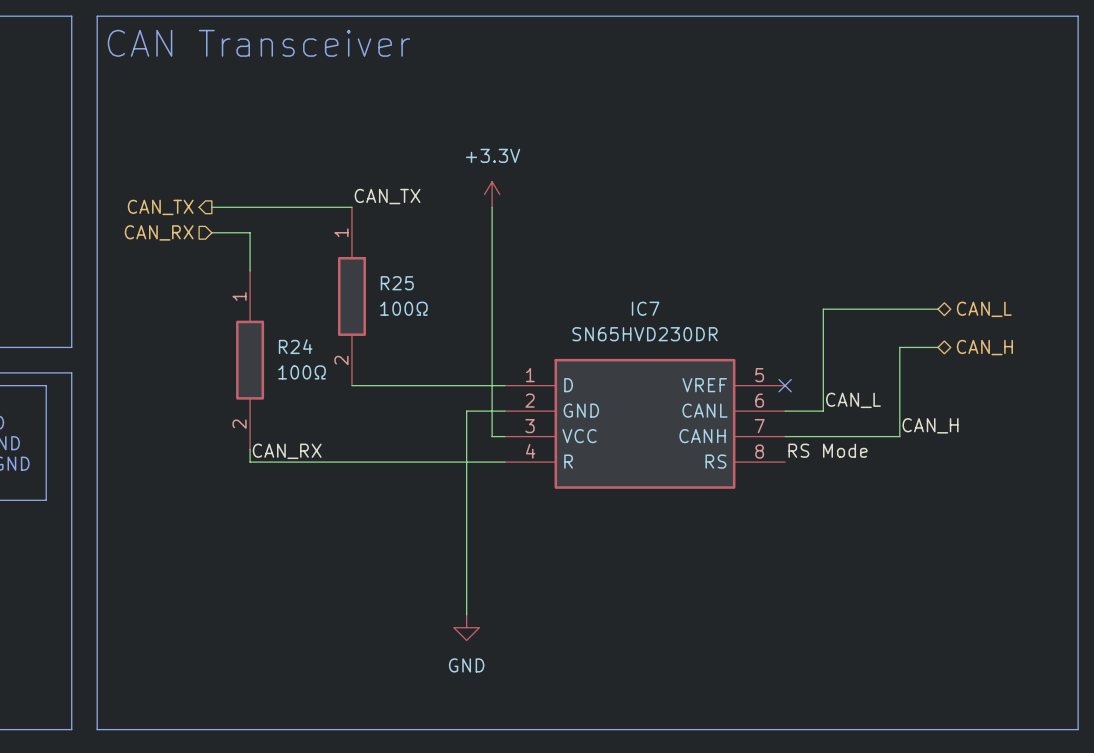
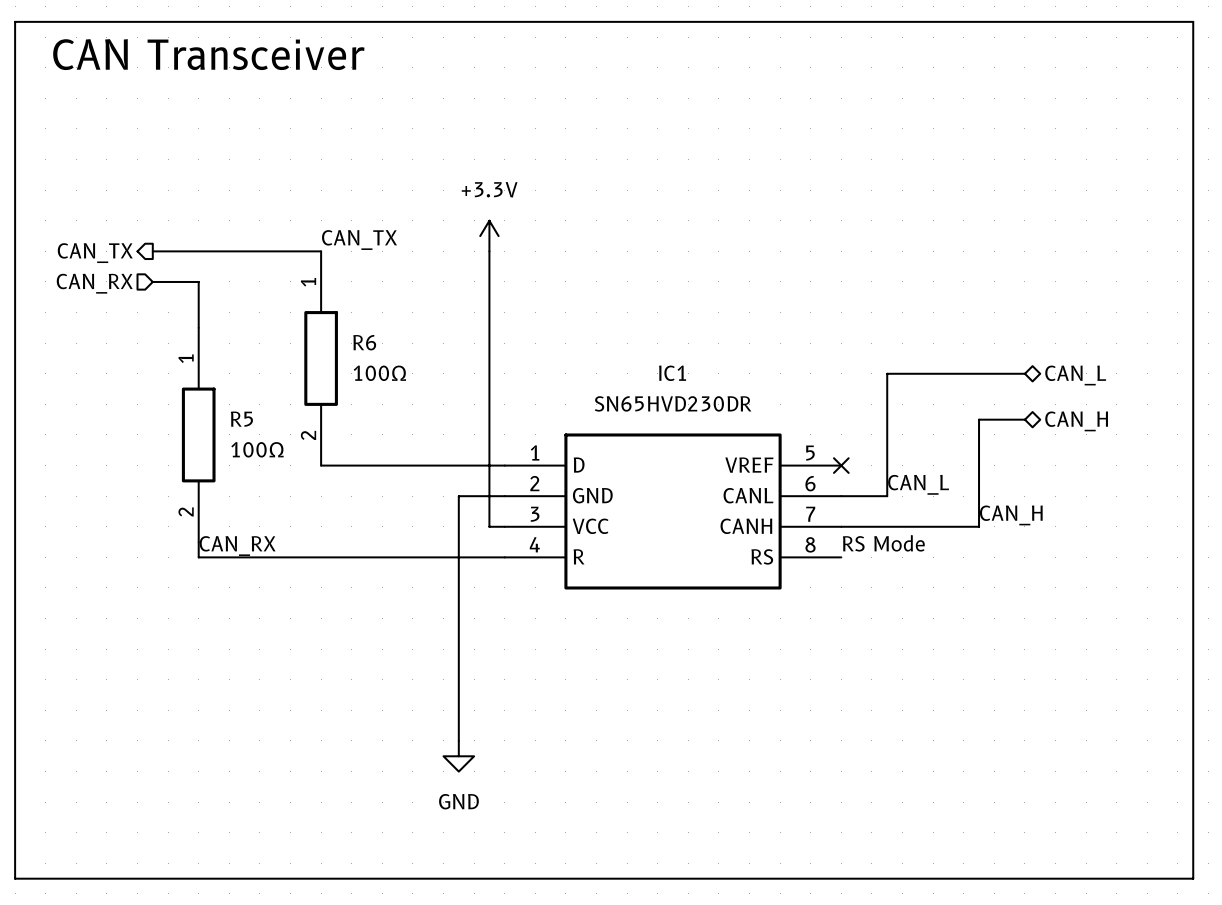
R25 name: R25 (397, 283) -> R6 (364, 342)
IC7 name: IC7 (645, 308) -> IC1 (672, 373)
R24 name: R24 (295, 346) -> R5 (241, 419)

